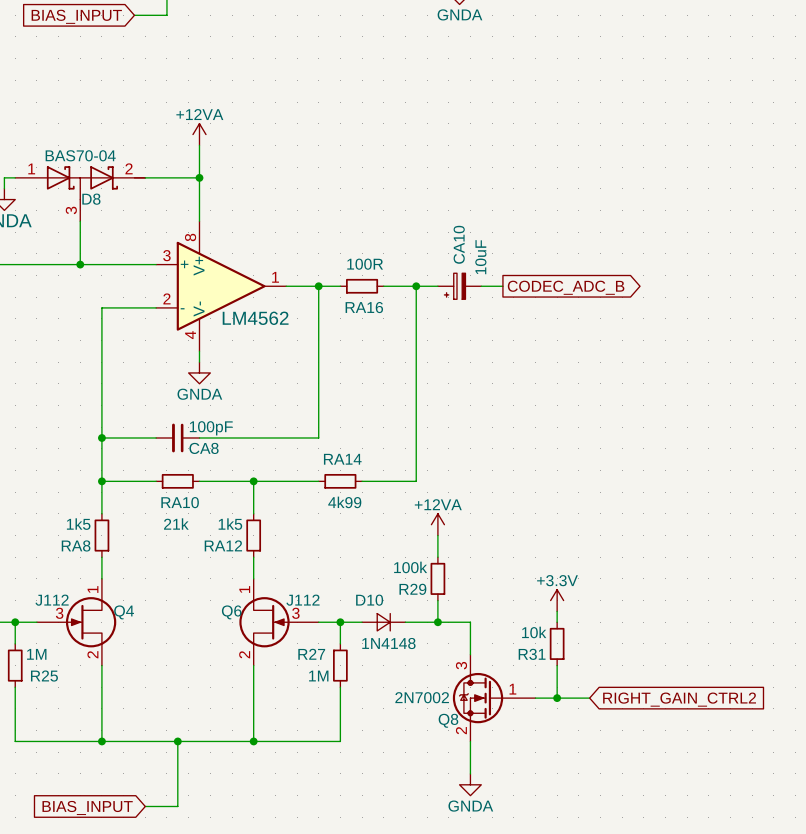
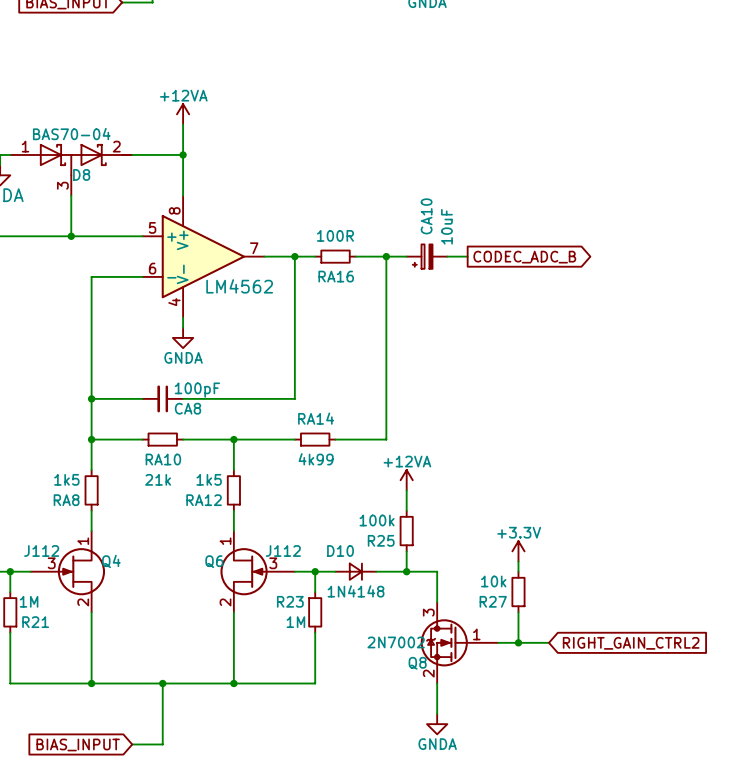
part pin number: 3 (166, 255) -> 5 (152, 227)
part pin number: 1 (275, 277) -> 7 (254, 248)
part pin number: 2 (166, 298) -> 6 (152, 268)
R29 name: R29 (412, 589) -> R25 (381, 540)
R27 name: R27 (311, 654) -> R23 (290, 601)
R31 name: R31 (532, 654) -> R27 (493, 601)
R25 name: R25 (44, 676) -> R21 (35, 622)

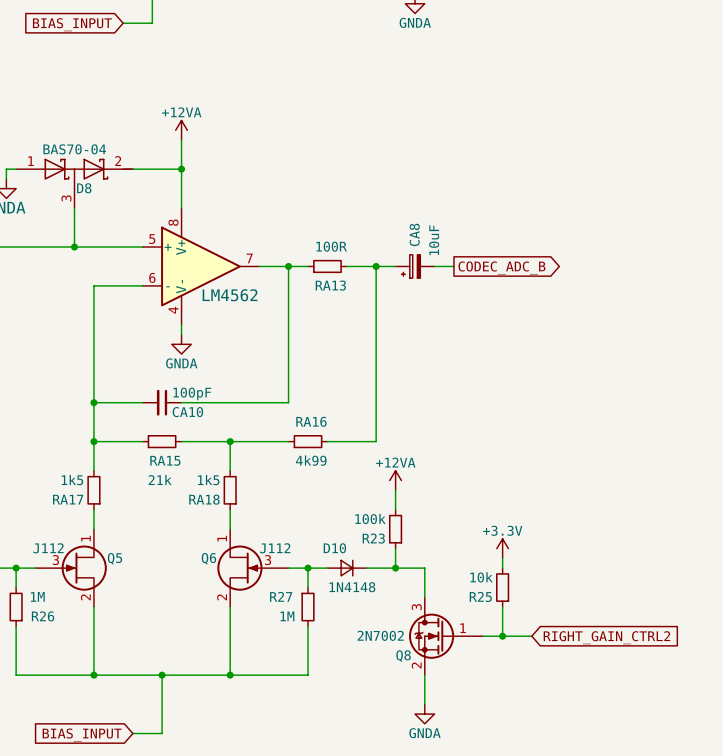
CA10 name: CA10 (426, 216) -> CA8 (414, 234)
RA16 name: RA16 (336, 276) -> RA13 (330, 285)
CA8 name: CA8 (187, 408) -> CA10 (187, 412)
RA14 name: RA14 (316, 418) -> RA16 (311, 421)
RA10 name: RA10 (163, 459) -> RA15 (165, 460)
RA8 name: RA8 (66, 500) -> RA17 (68, 499)
RA12 name: RA12 (204, 500) -> RA18 (204, 499)
R25 name: R25 (381, 540) -> R23 (373, 538)
Q4 name: Q4 (111, 561) -> Q5 (114, 558)
R23 name: R23 (290, 601) -> R27 (281, 596)
R27 name: R27 (493, 601) -> R25 (480, 596)
R21 name: R21 (35, 622) -> R26 (43, 616)

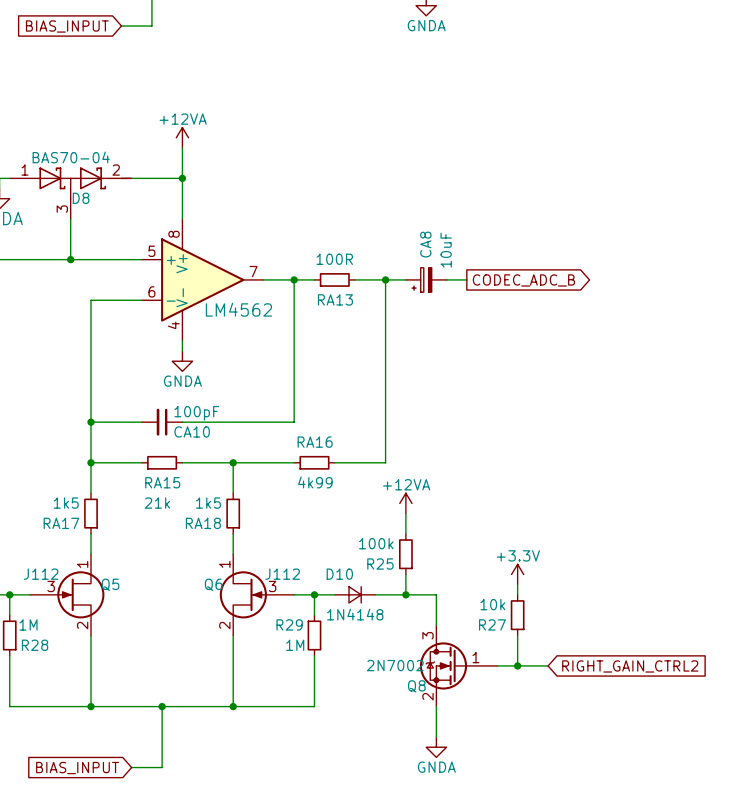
R23 name: R23 (373, 538) -> R25 (380, 564)
R27 name: R27 (281, 596) -> R29 (289, 624)
R25 name: R25 (480, 596) -> R27 (492, 624)
R26 name: R26 (43, 616) -> R28 (35, 645)

